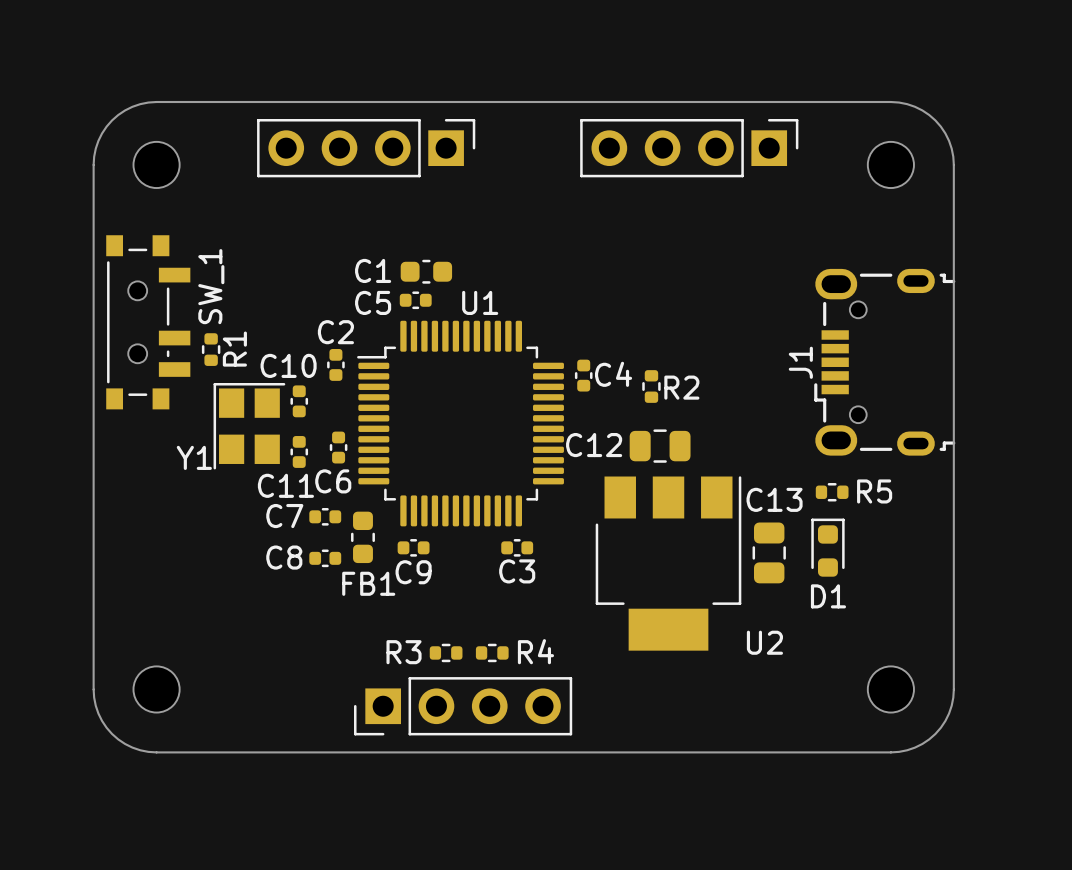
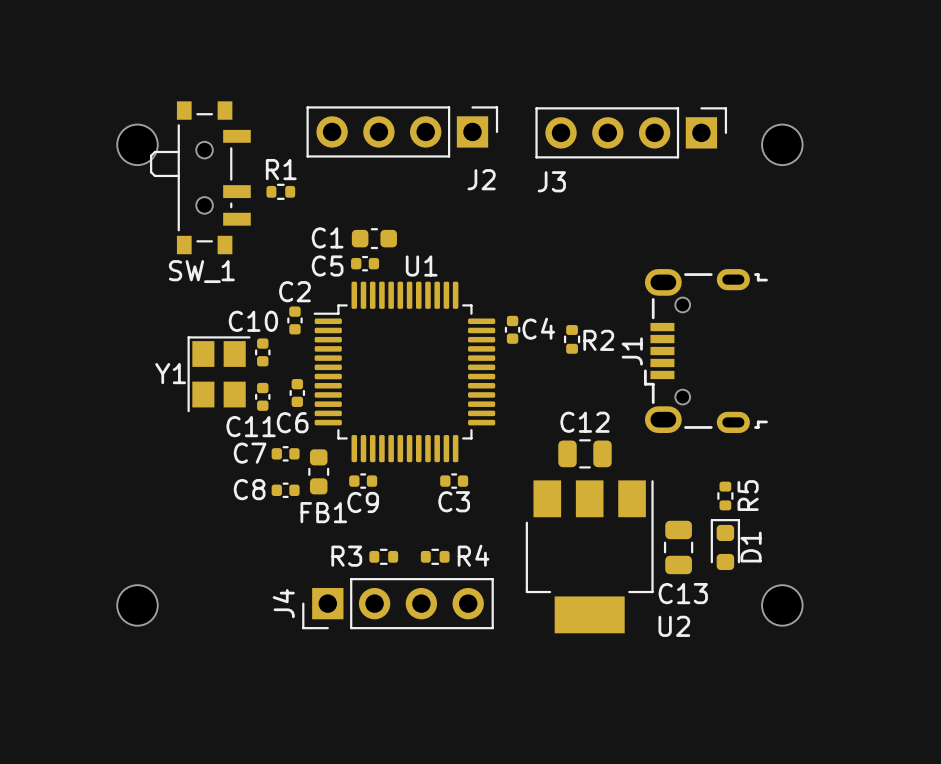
board edge: (156, 102) (890, 102) (907, 104) (929, 115) (940, 126) (949, 140) (953, 164) (953, 689) (951, 705) (940, 727) (922, 743) (907, 750) (890, 752) (156, 752) (140, 750) (118, 739) (102, 720) (95, 705) (93, 689) (93, 164) (98, 140) (112, 120) (132, 106) (156, 102) -> none
part: (366, 148) -> none
part: (689, 148) -> none
J2: none -> (402, 131)
J3: none -> (631, 132)
SW_1 footprint: [106, 235, 191, 410] -> [150, 101, 251, 255]
SW_1 name position: SW_1 (211, 286) -> SW_1 (201, 271)
R1 rotation: 0° (211, 349) -> 90° clockwise (280, 191)
R1 position: (211, 349) -> (280, 191)
J1 position: (884, 362) -> (705, 351)
C12 name position: C12 (594, 445) -> C12 (585, 422)
C12 position: (660, 446) -> (585, 453)
Y1 name position: Y1 (194, 457) -> Y1 (170, 373)
R5 rotation: 0° (832, 492) -> 90° clockwise (725, 496)
R5 position: (832, 492) -> (725, 496)
C13 name position: C13 (774, 499) -> C13 (683, 593)
D1 position: (827, 547) -> (725, 544)
C13 position: (769, 552) -> (678, 547)
U2 position: (668, 563) -> (589, 556)
D1 name rotation: 0° (828, 596) -> 90° counterclockwise (751, 547)
R3 position: (446, 652) -> (383, 556)
R4 position: (492, 652) -> (435, 556)
J4: none -> (398, 603)
part: (463, 706) -> none

